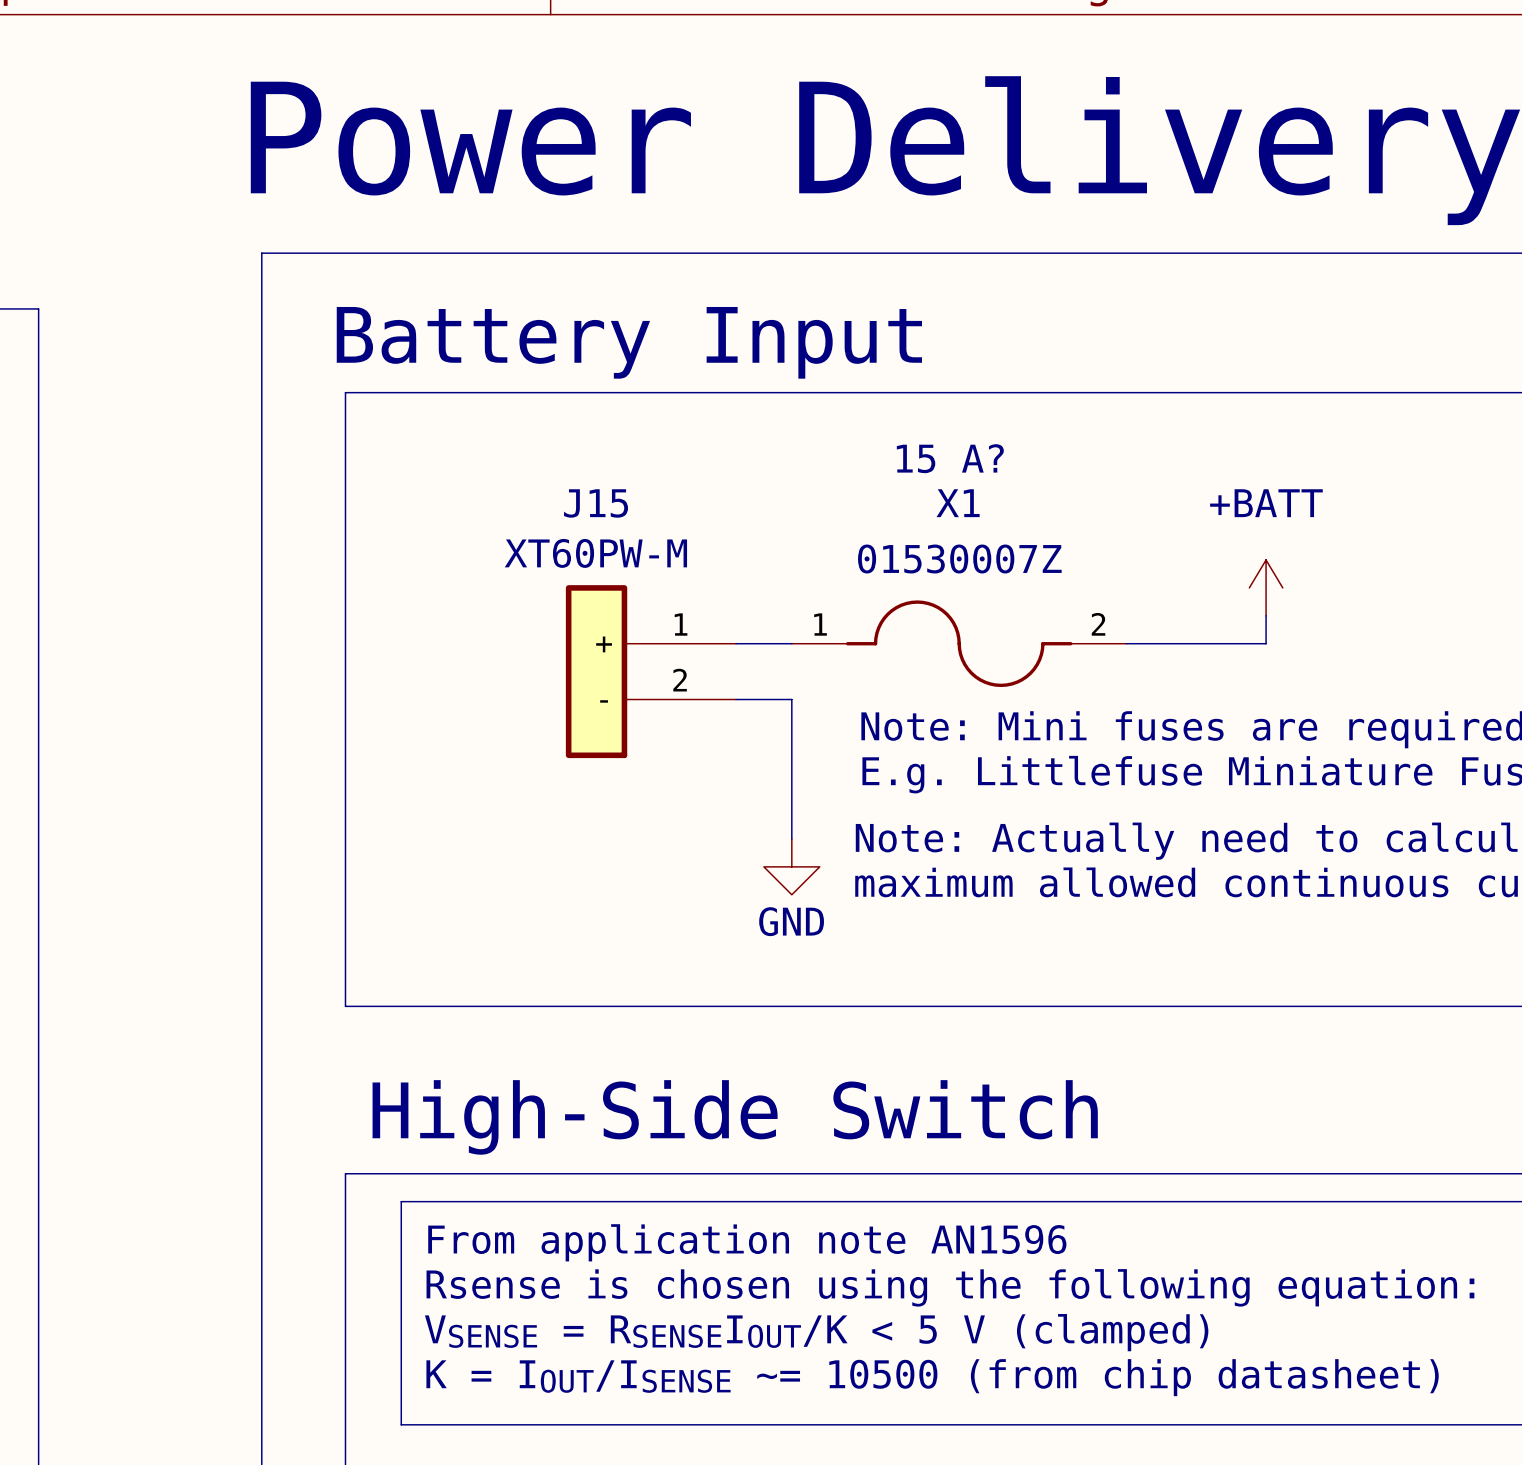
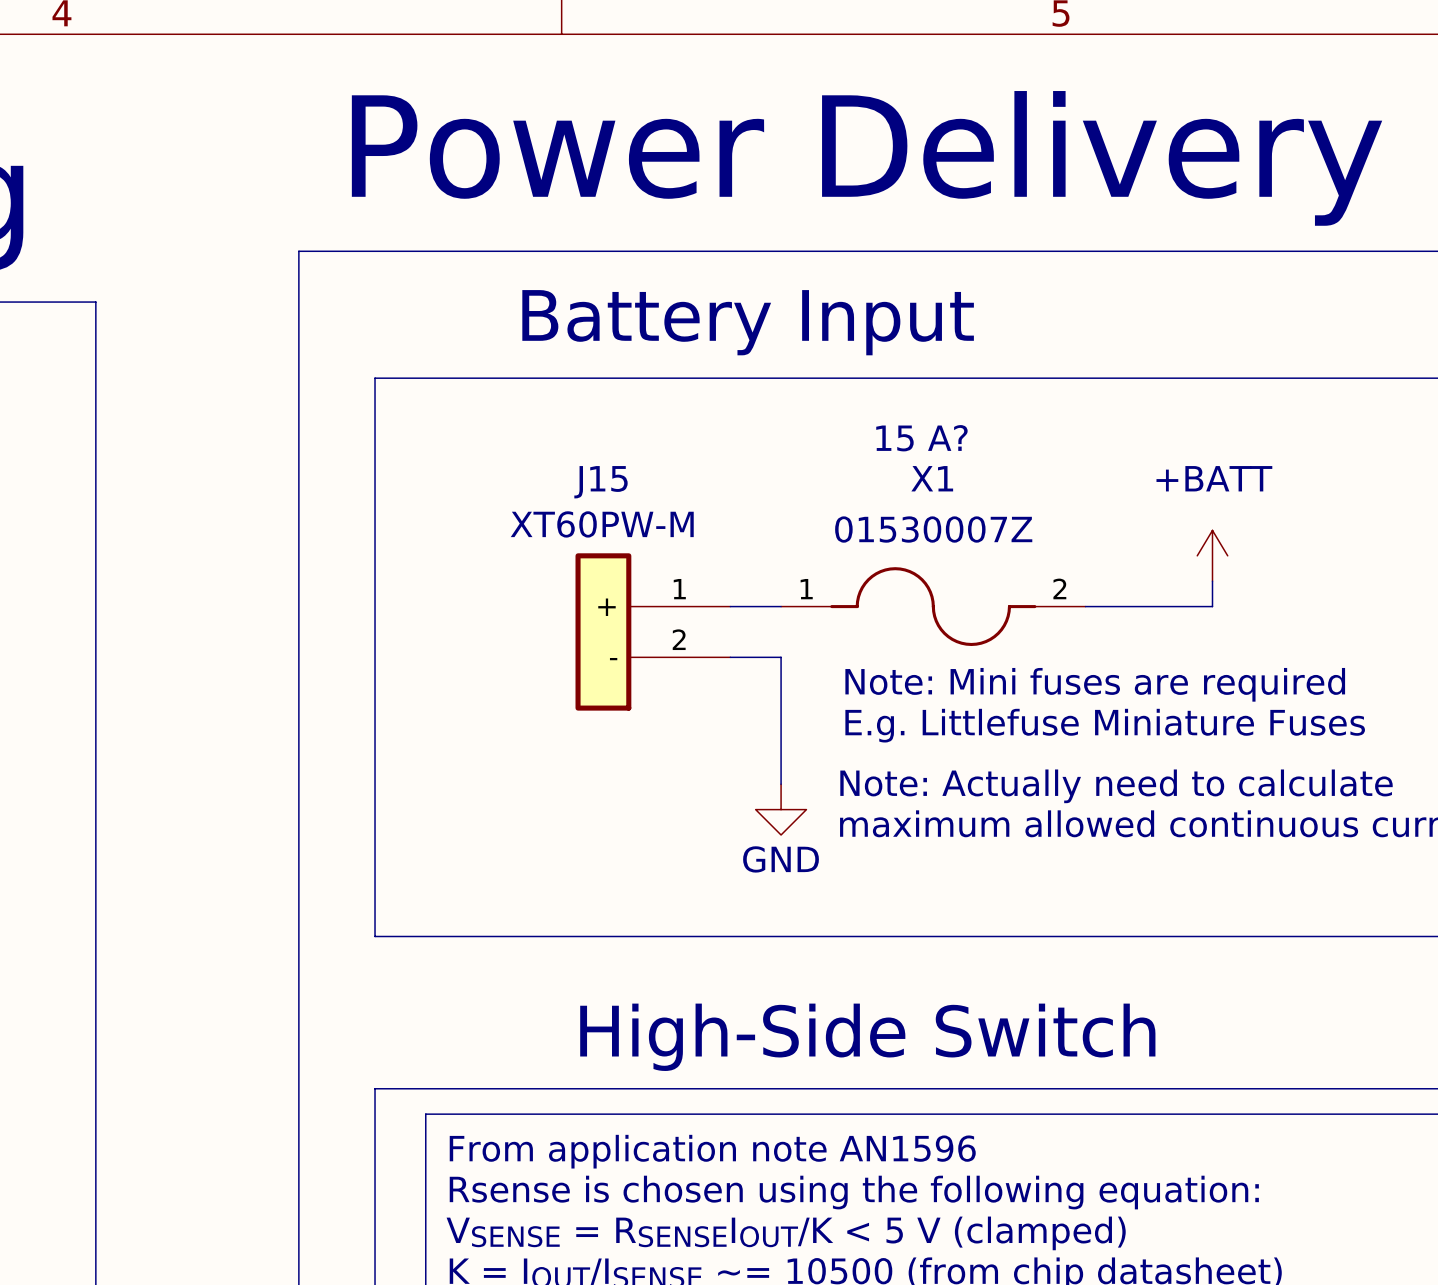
text position: Battery Input (629, 342) -> Battery Input (748, 322)
text position: High-Side Switch (735, 1117) -> High-Side Switch (867, 1037)

